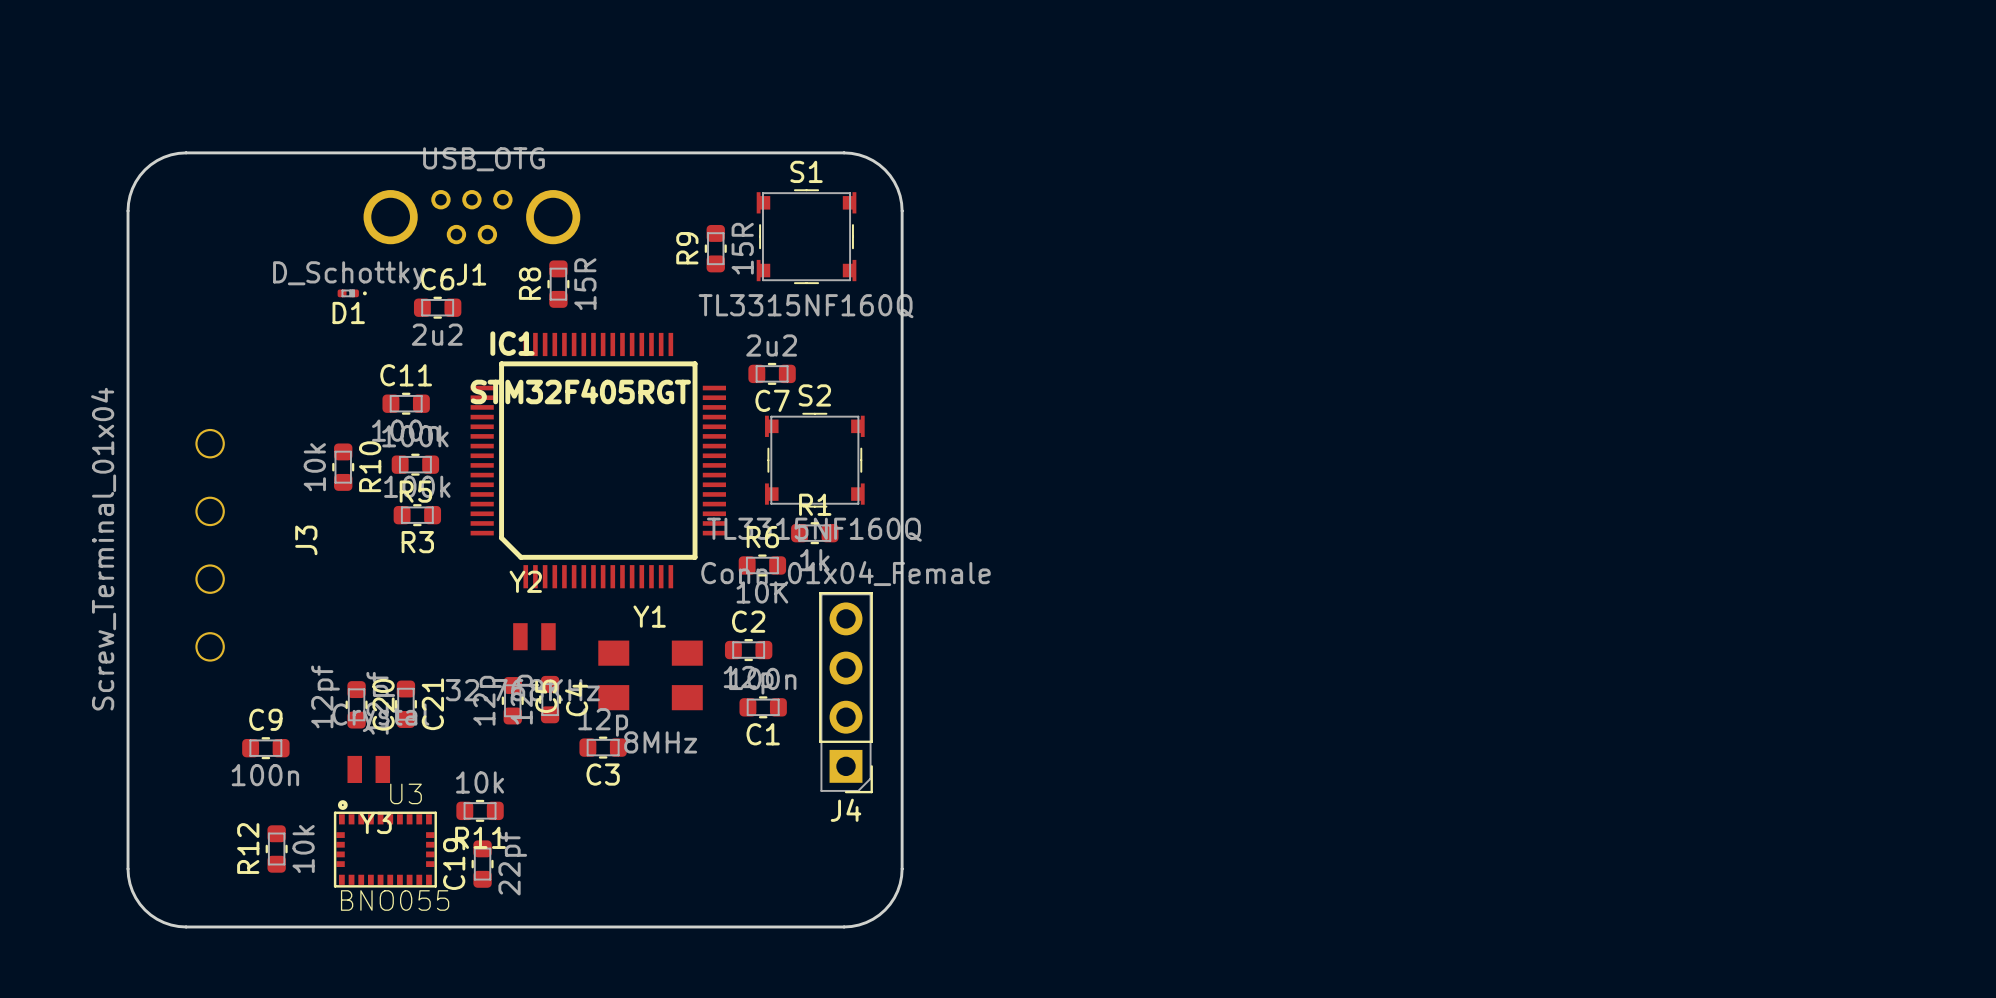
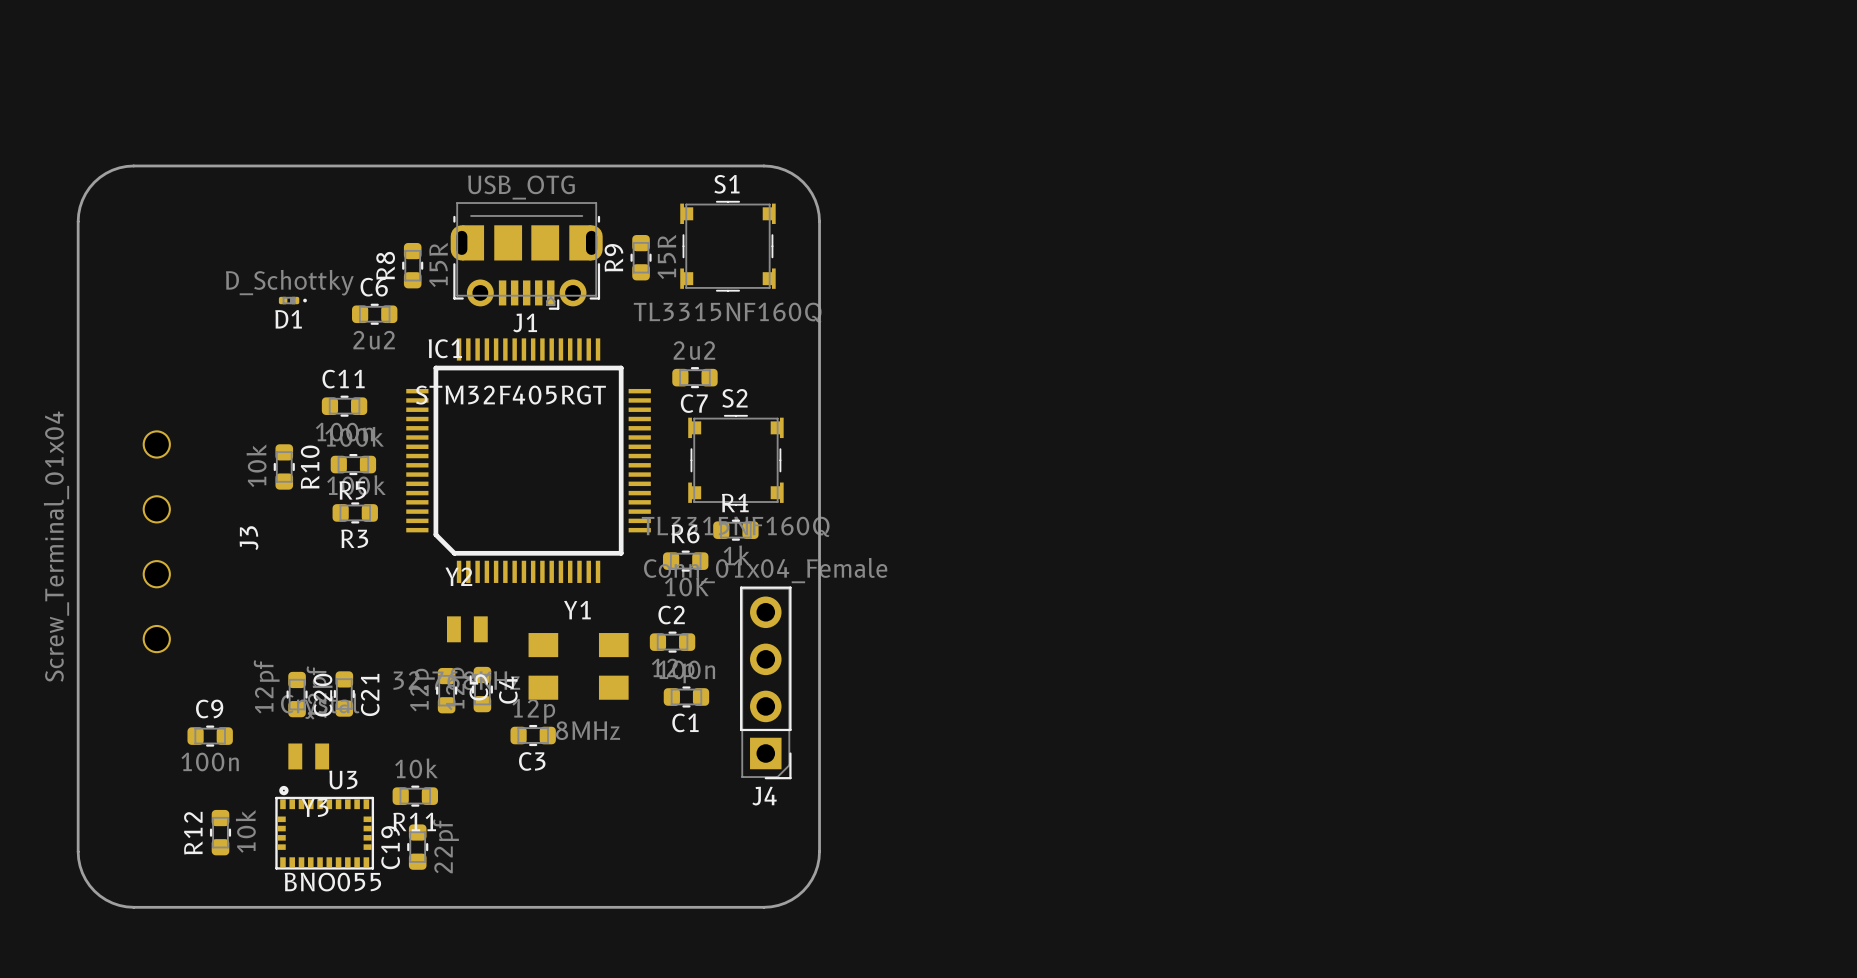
J1 footprint: [363, 190, 581, 245] -> [450, 202, 603, 310]
R8 position: (558, 284) -> (412, 265)

